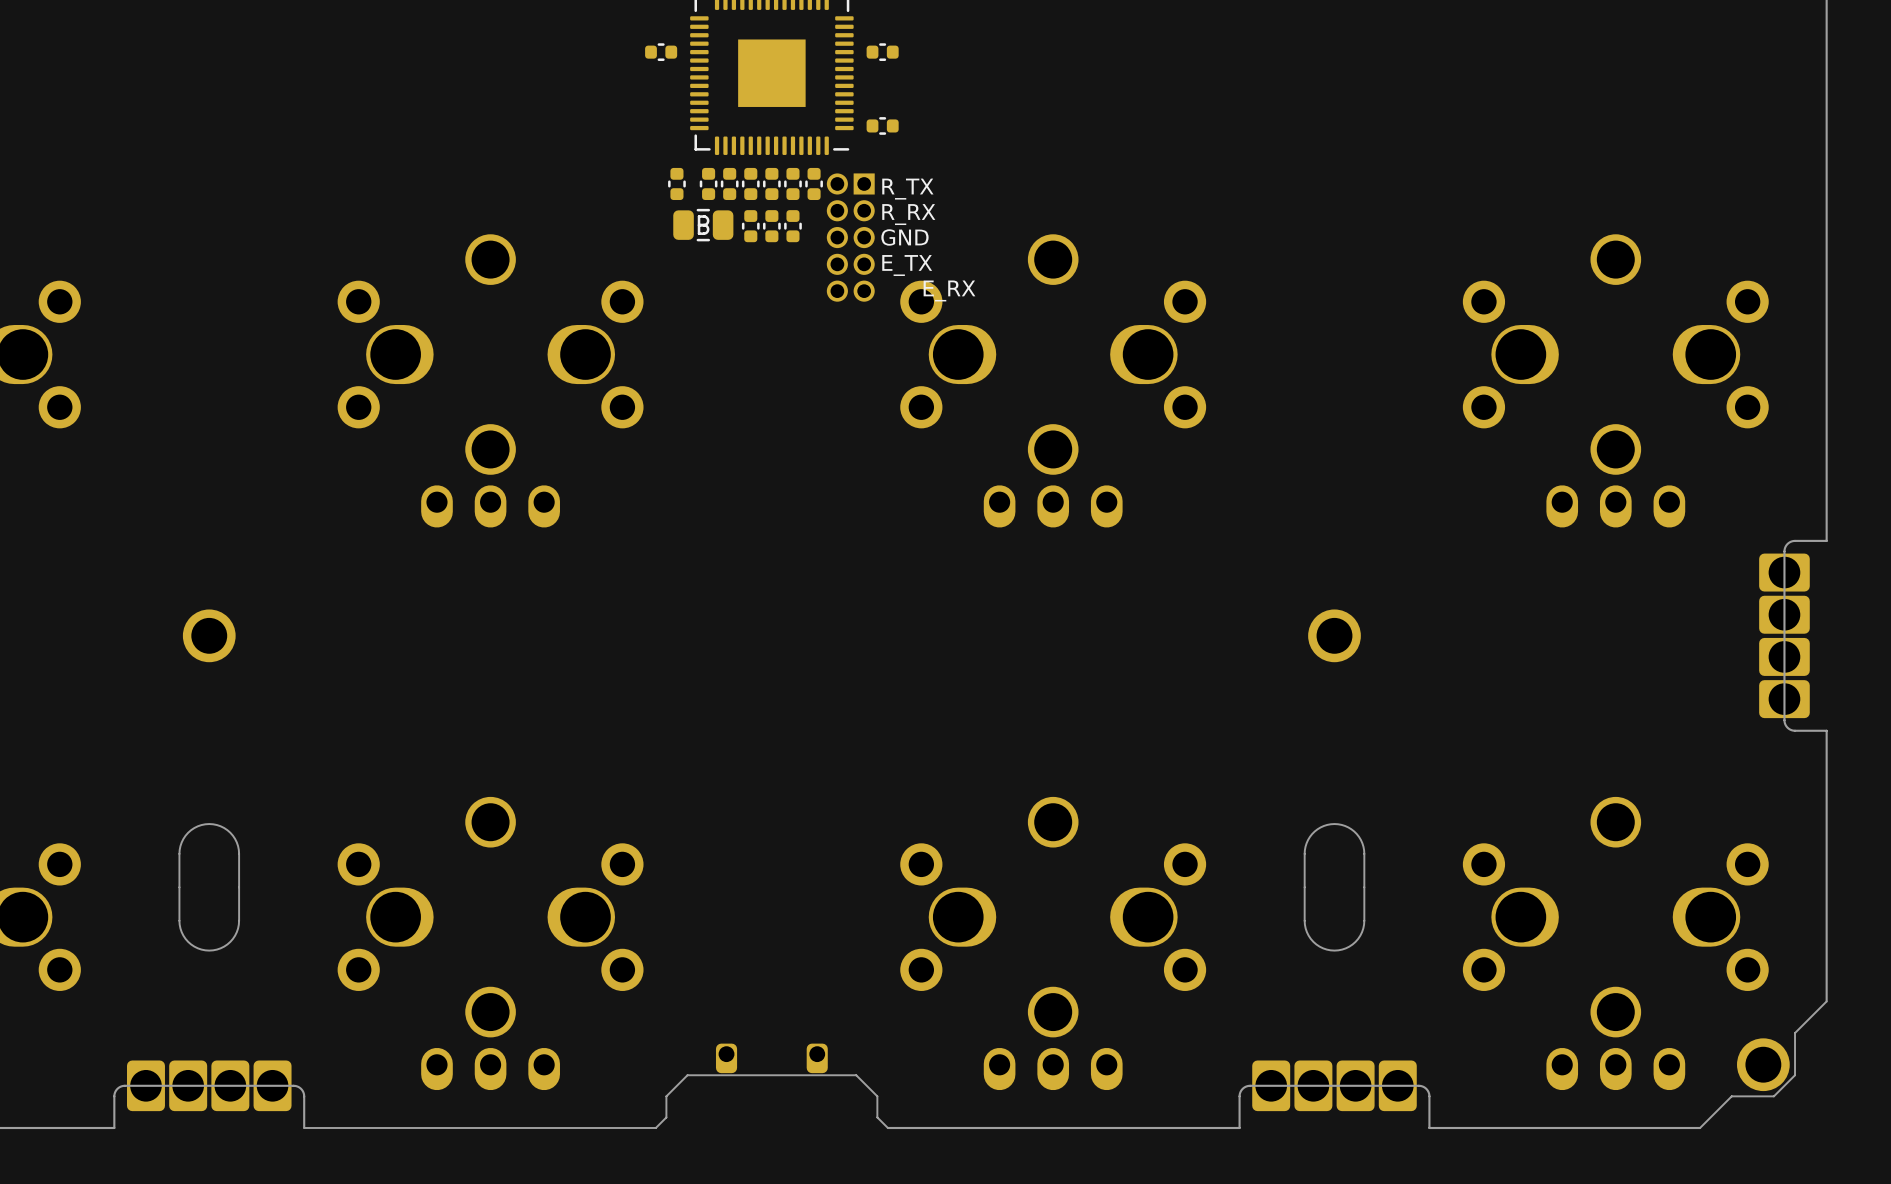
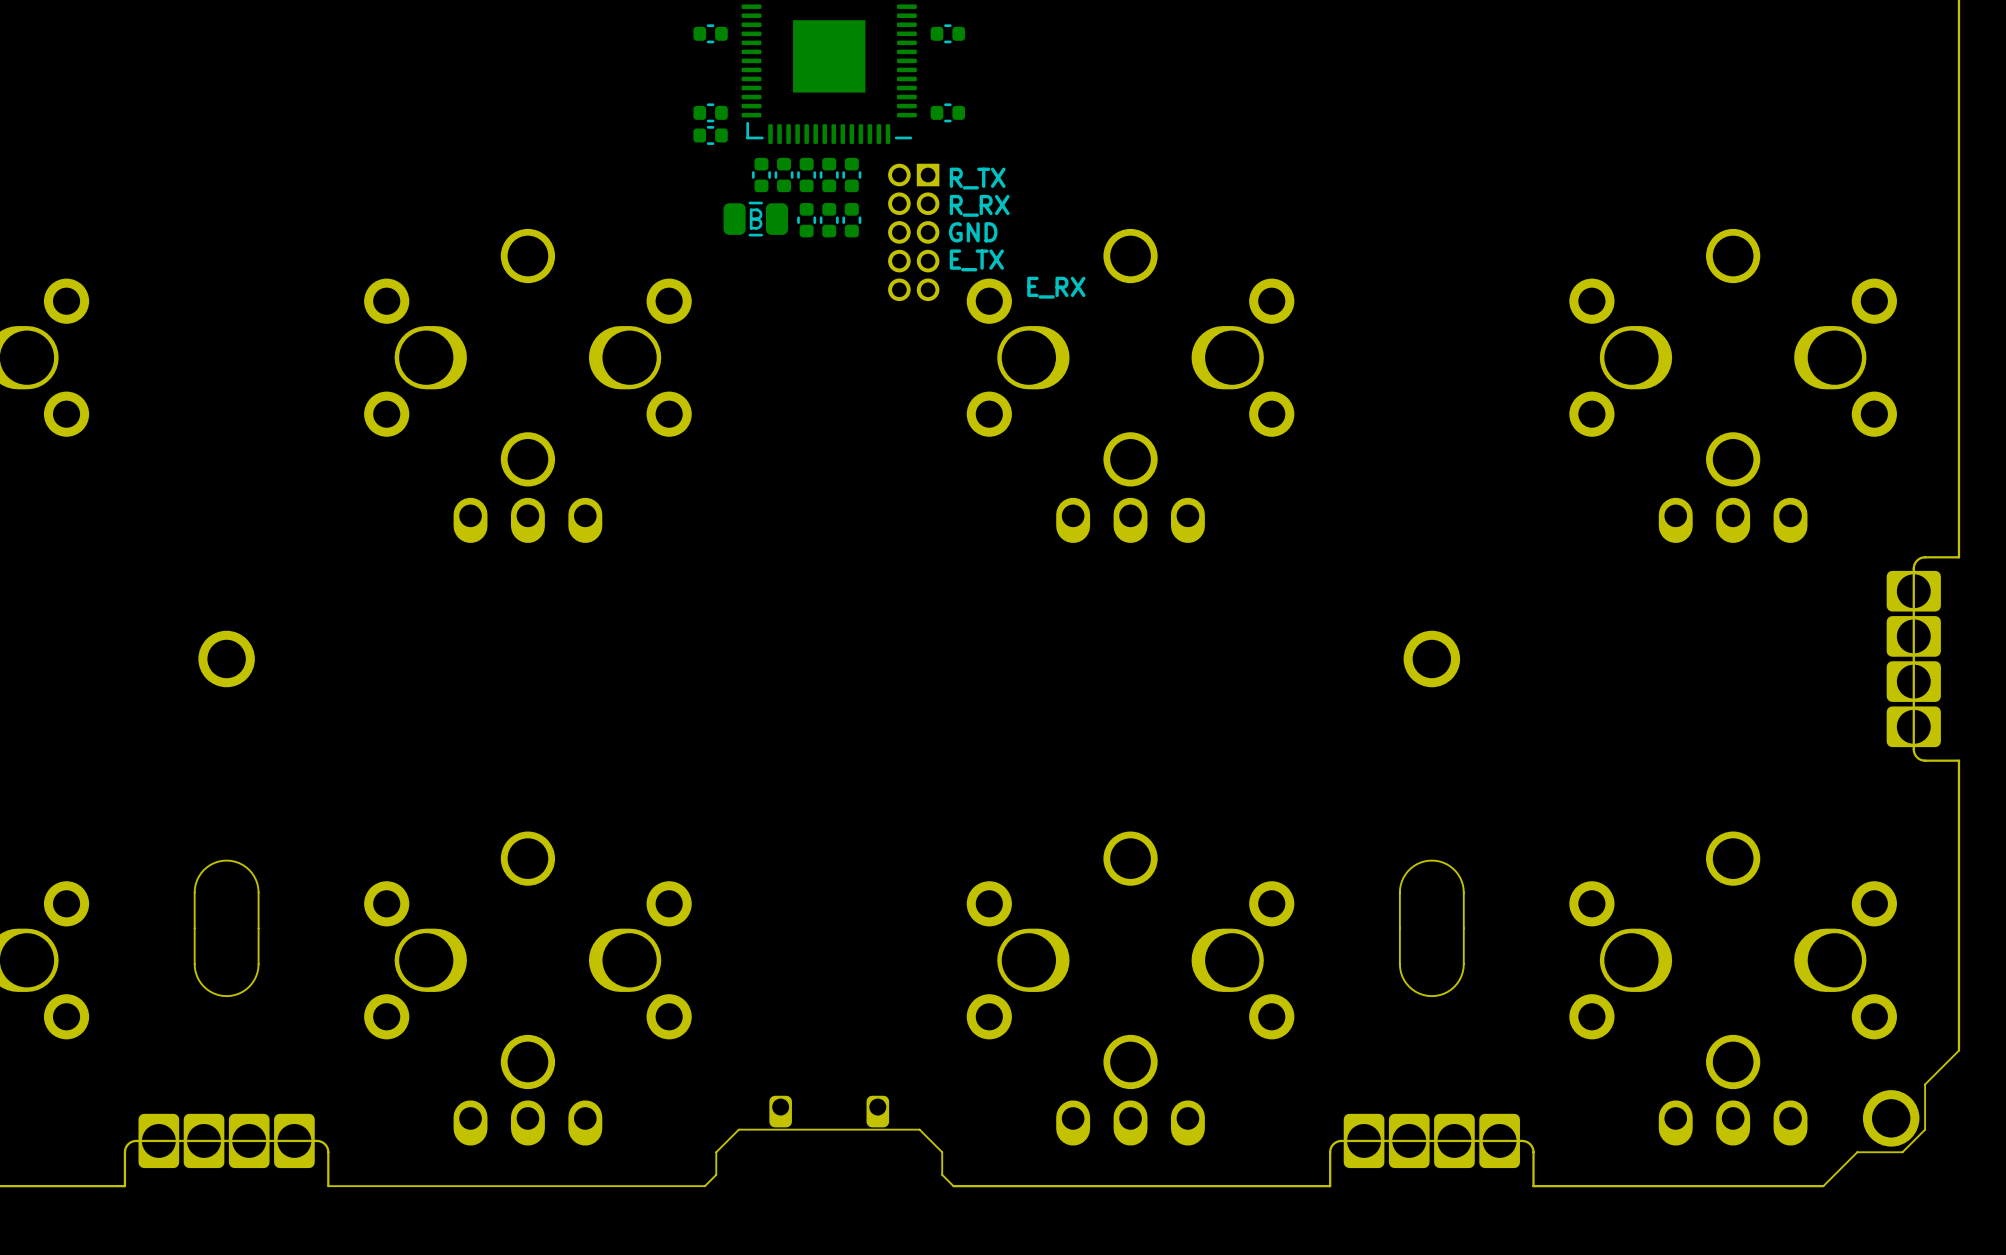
part: none -> (710, 112)
part: none -> (710, 135)
part: (676, 183) -> none
part: (814, 183) -> none

